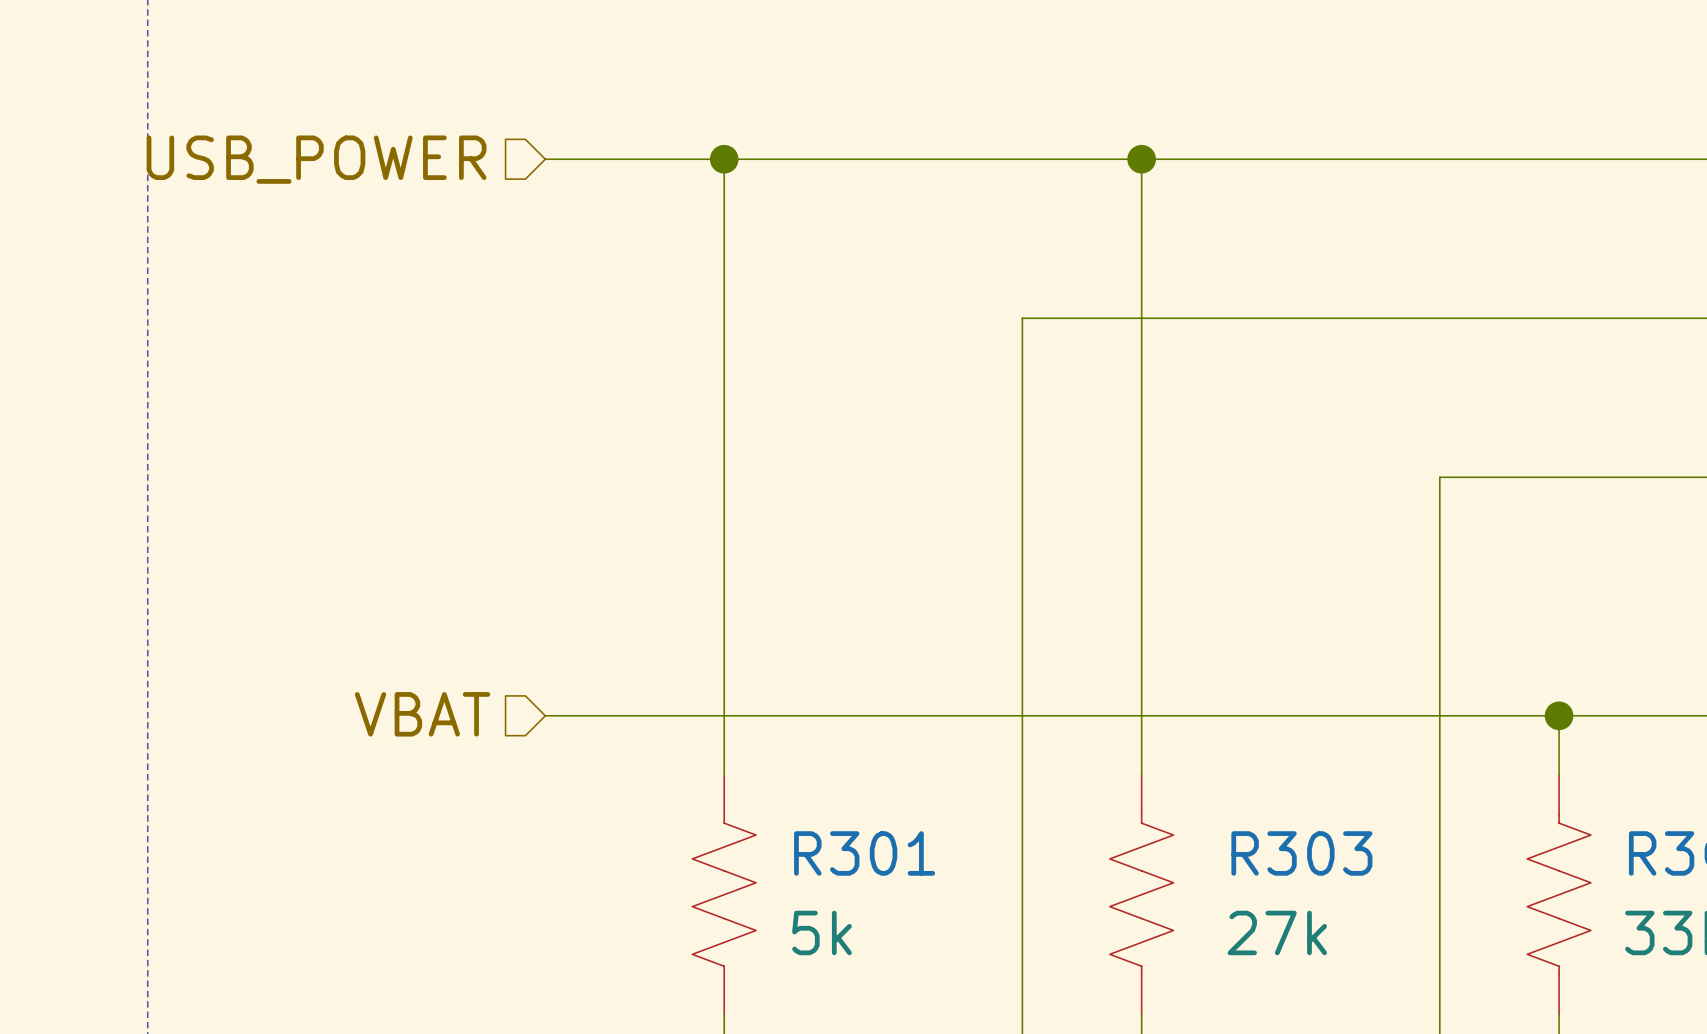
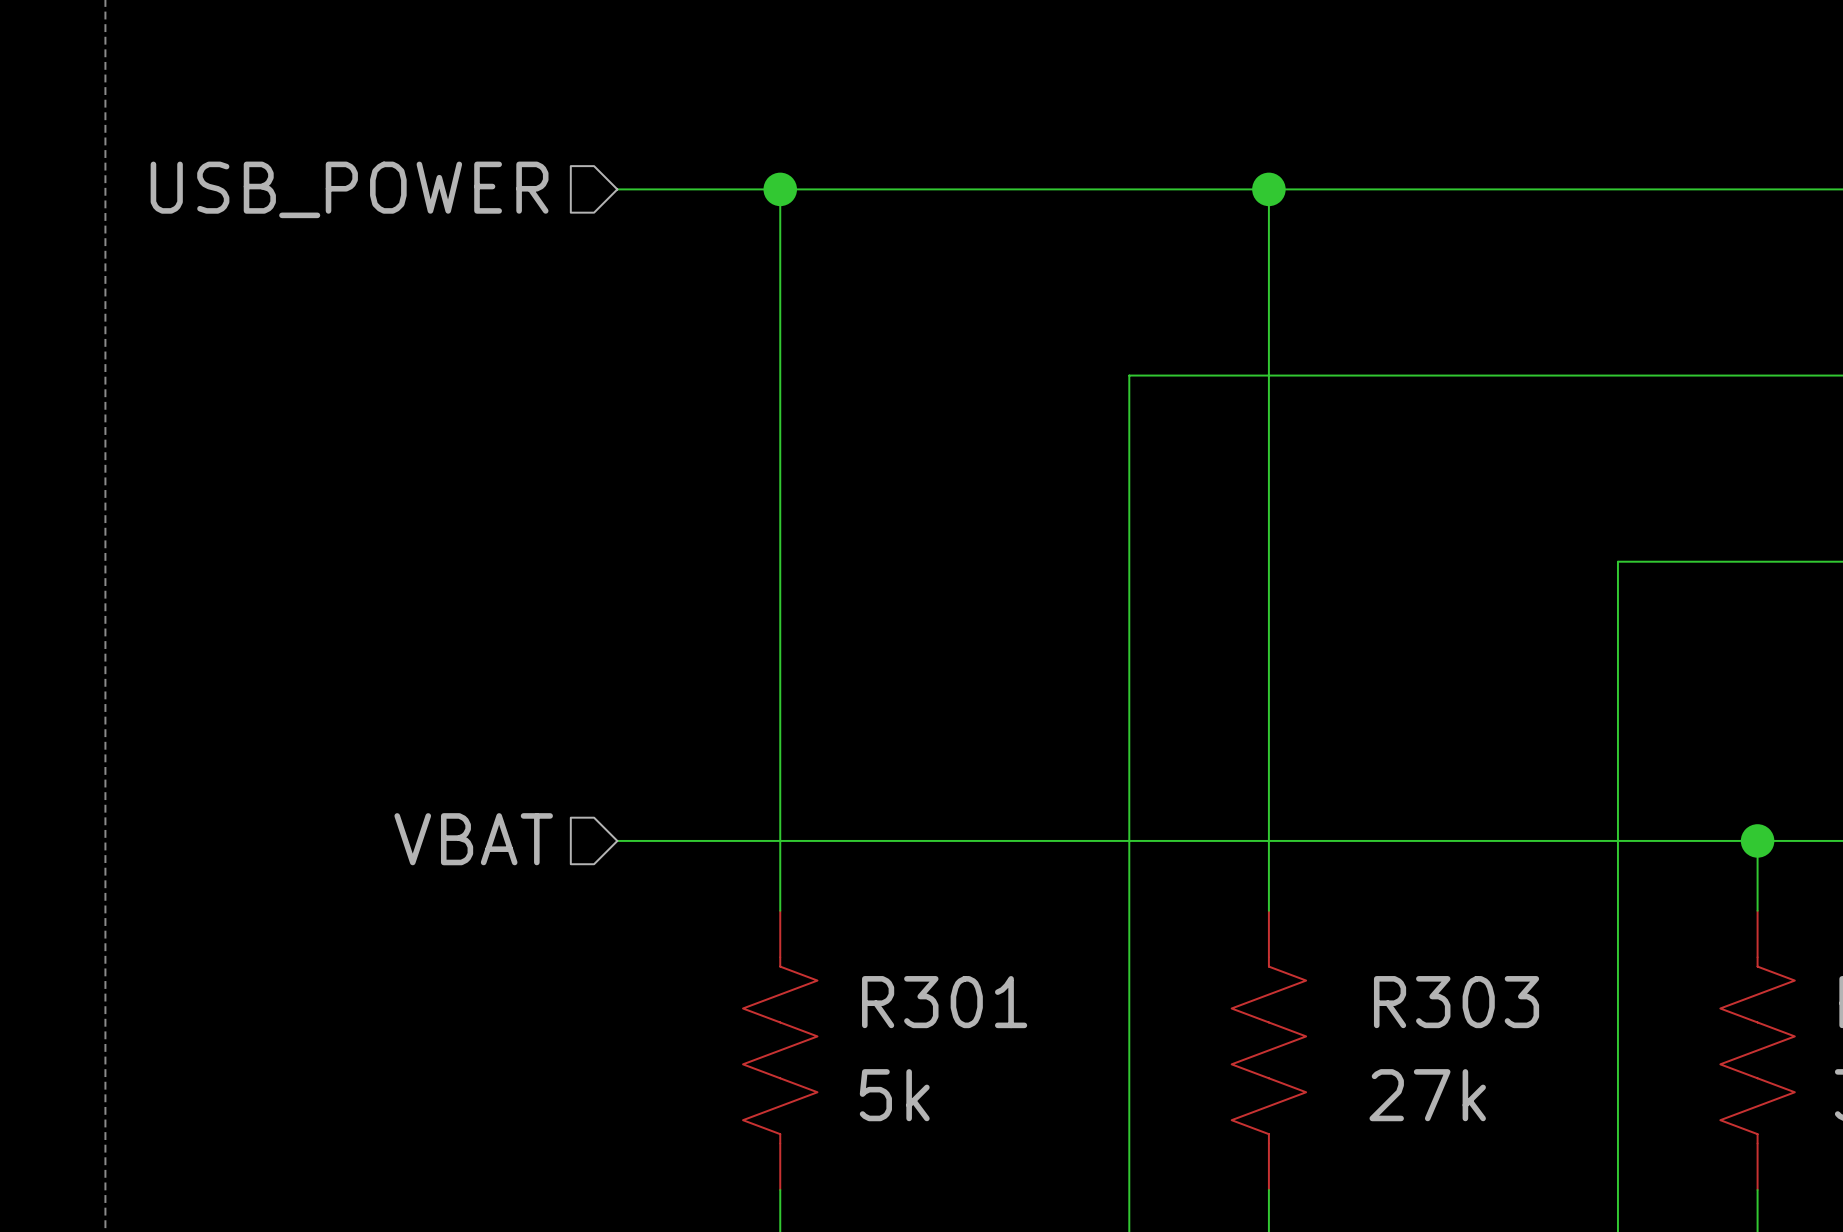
hierarchical label position: USB_POWER (316, 159) -> USB_POWER (349, 189)
wire: (545, 159) (585, 159) -> none
hierarchical label position: VBAT (422, 714) -> VBAT (473, 839)
wire: (545, 715) (585, 715) -> none

